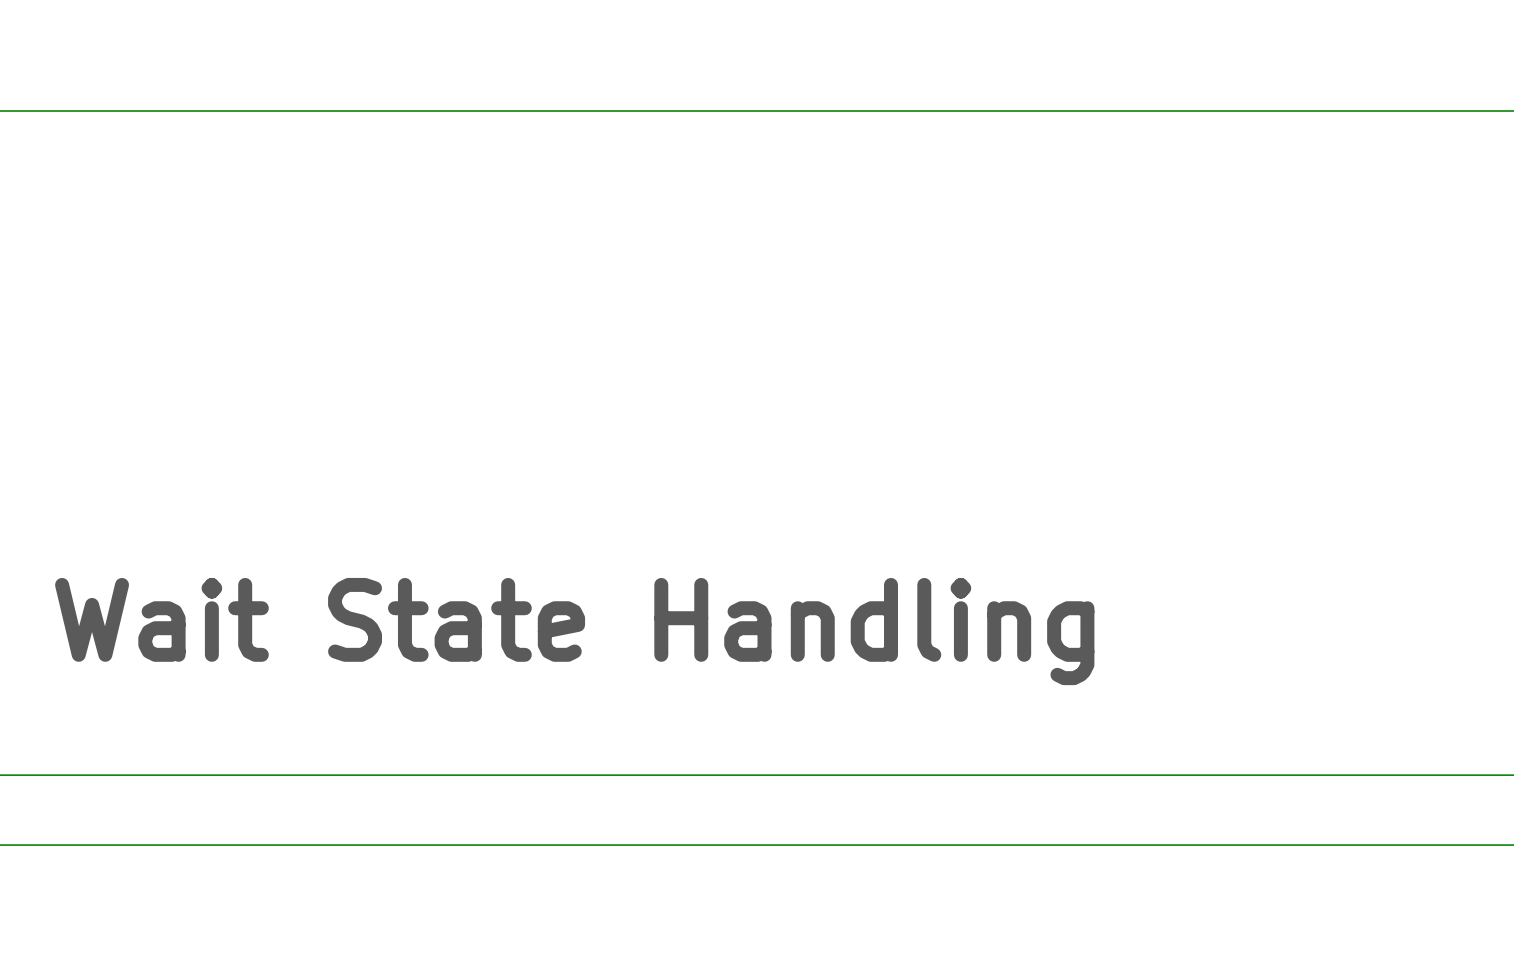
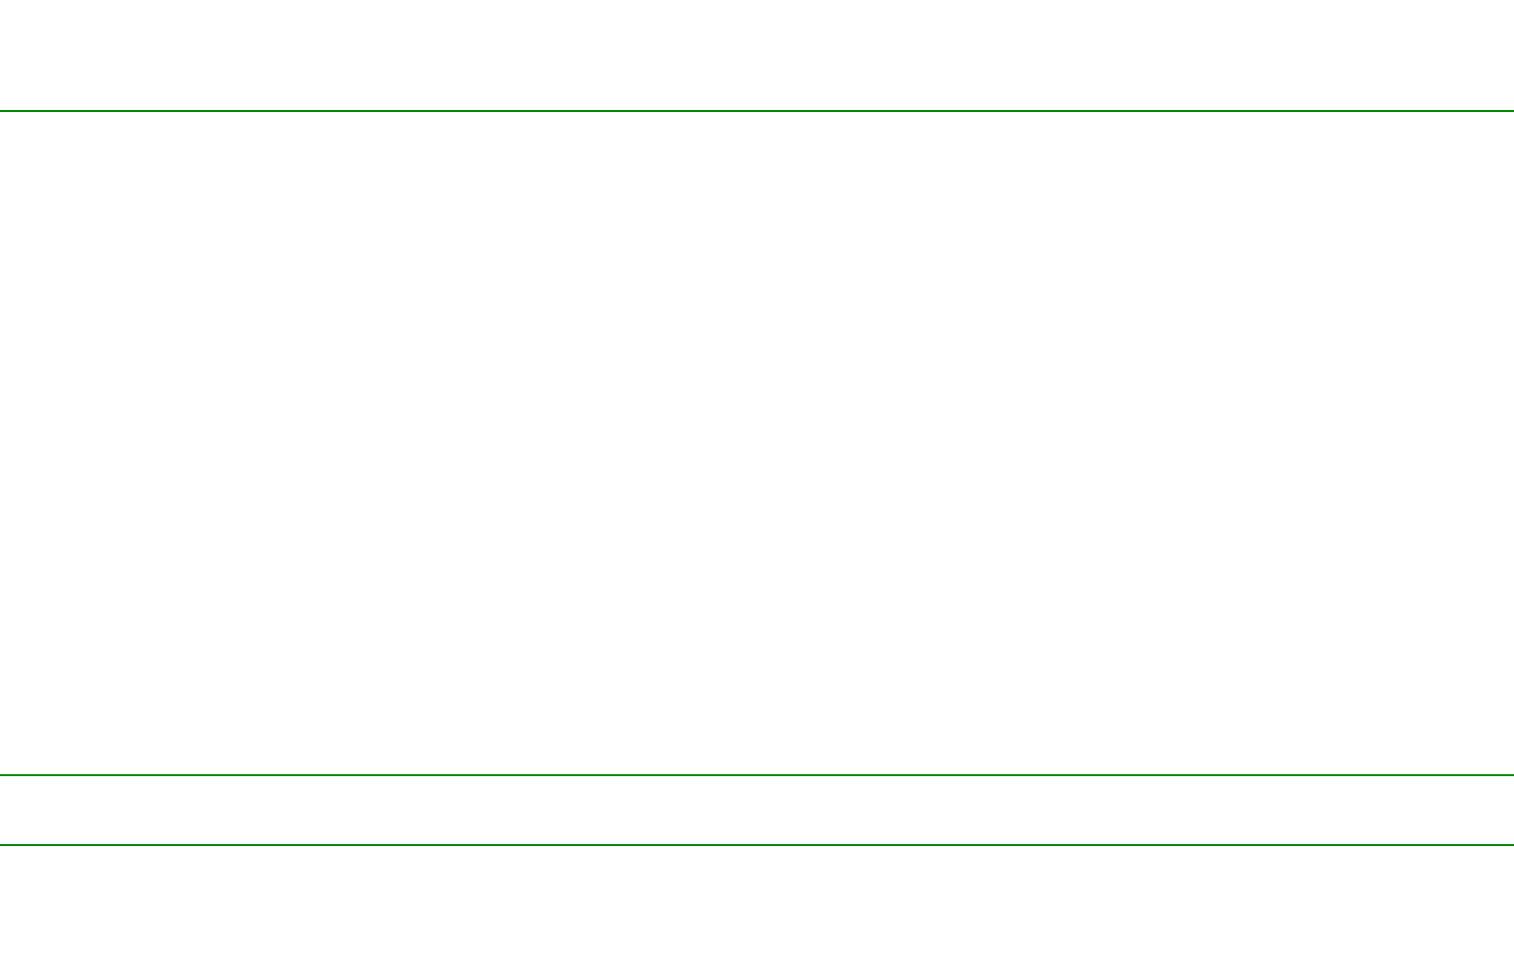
text: Wait State Handling (574, 631) -> none

